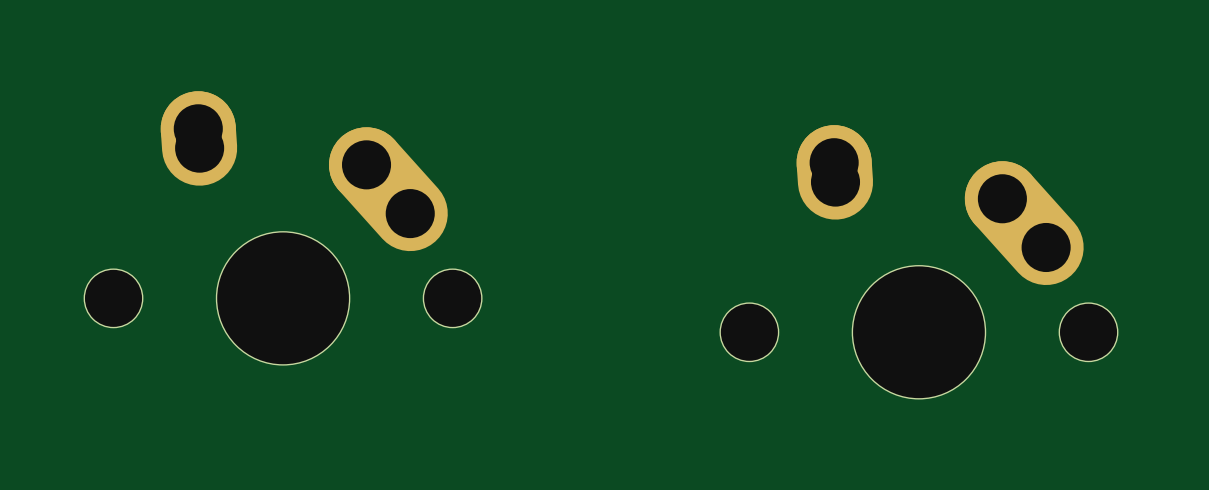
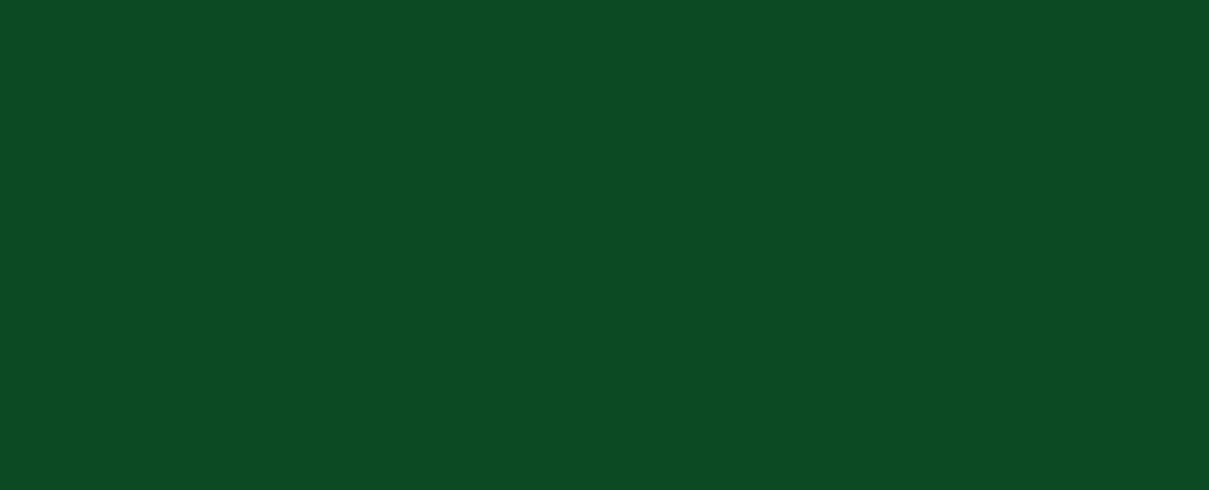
part: (283, 228) -> none
part: (918, 261) -> none

